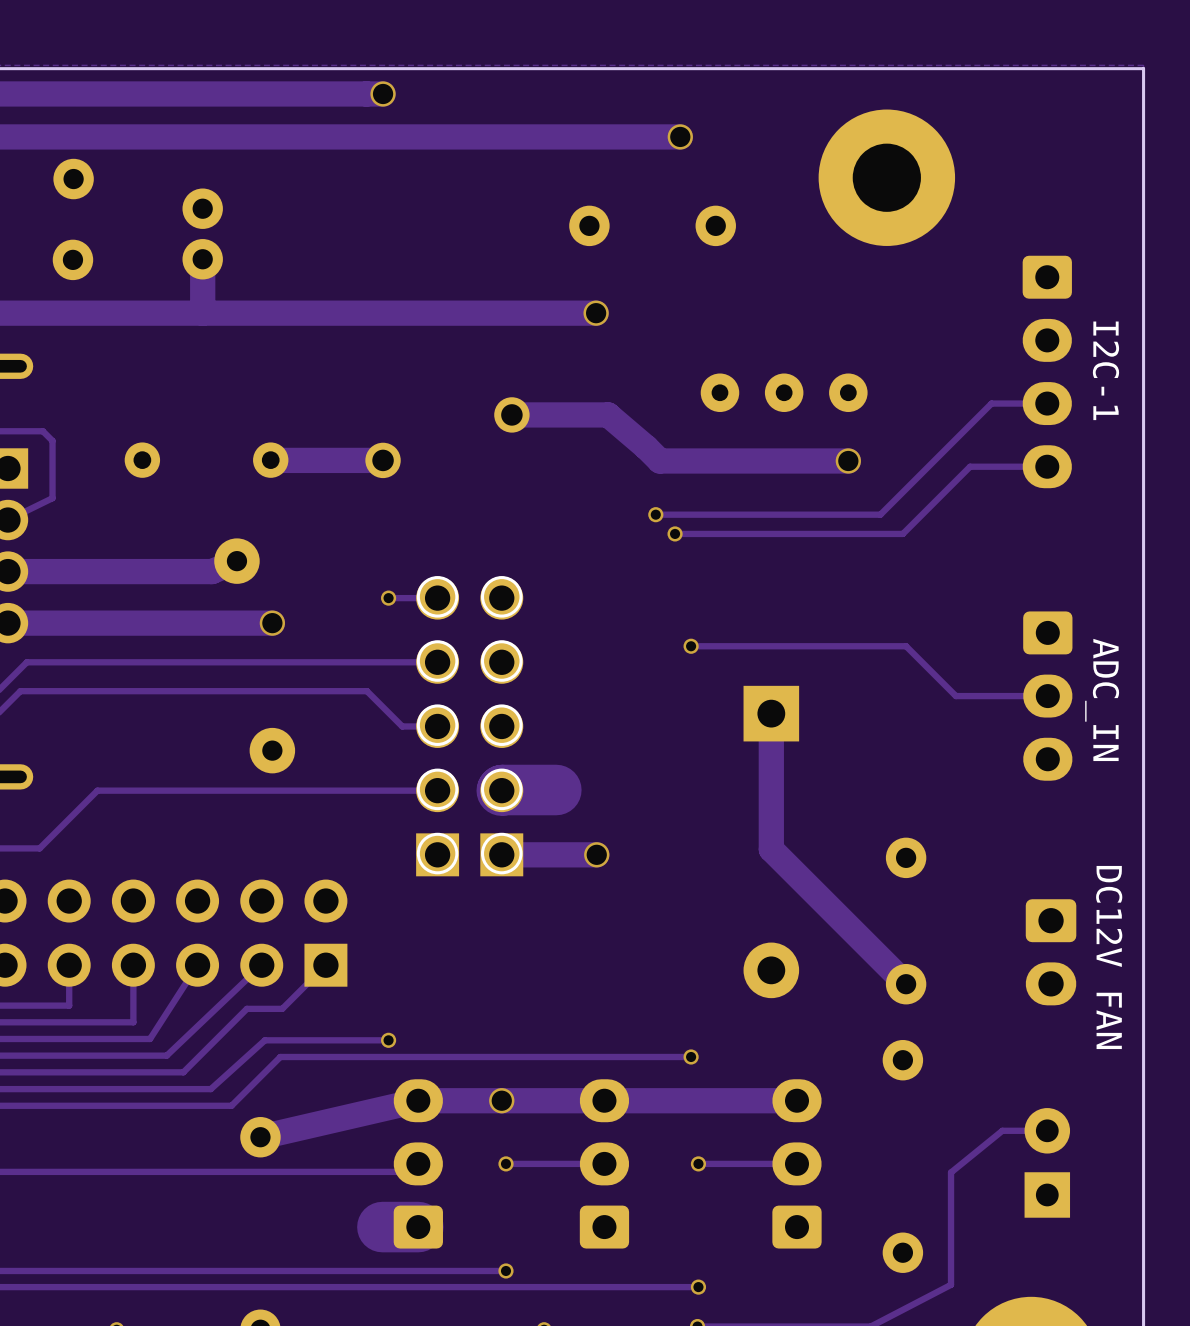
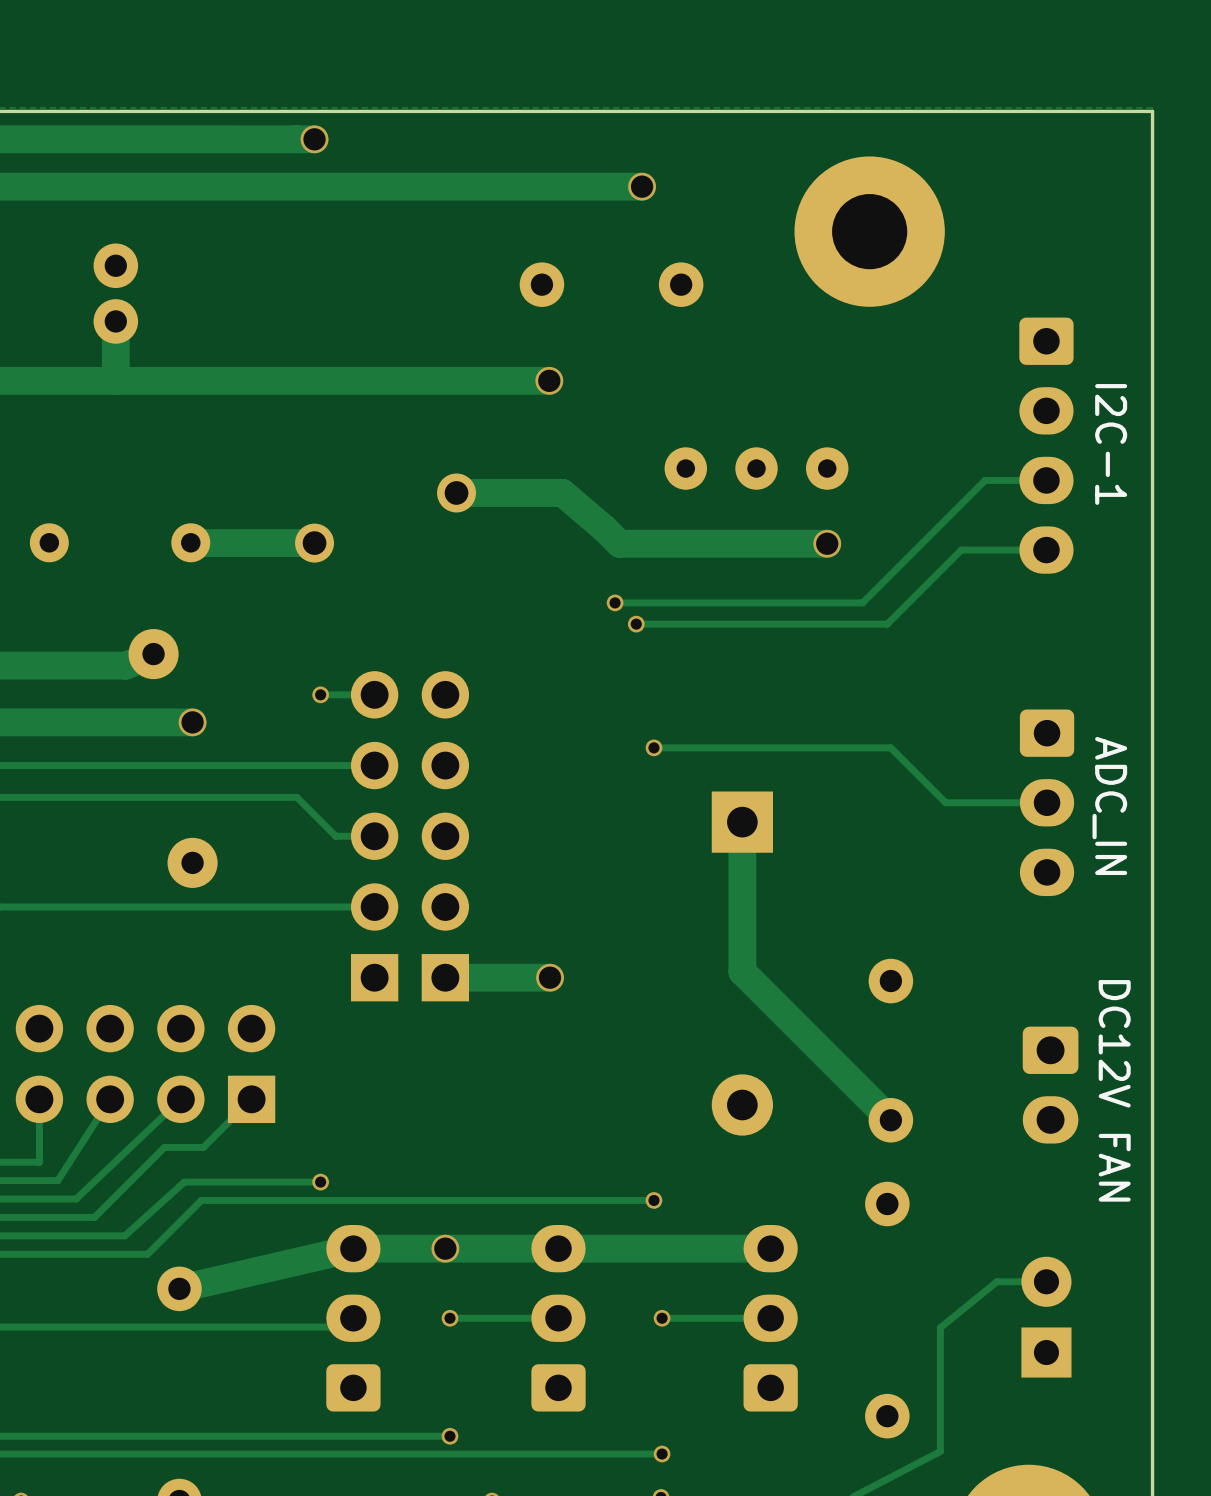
drawing: [416, 576, 523, 875] -> none
track: (556, 790) (501, 790) -> none
track: (418, 1227) (382, 1227) -> none

